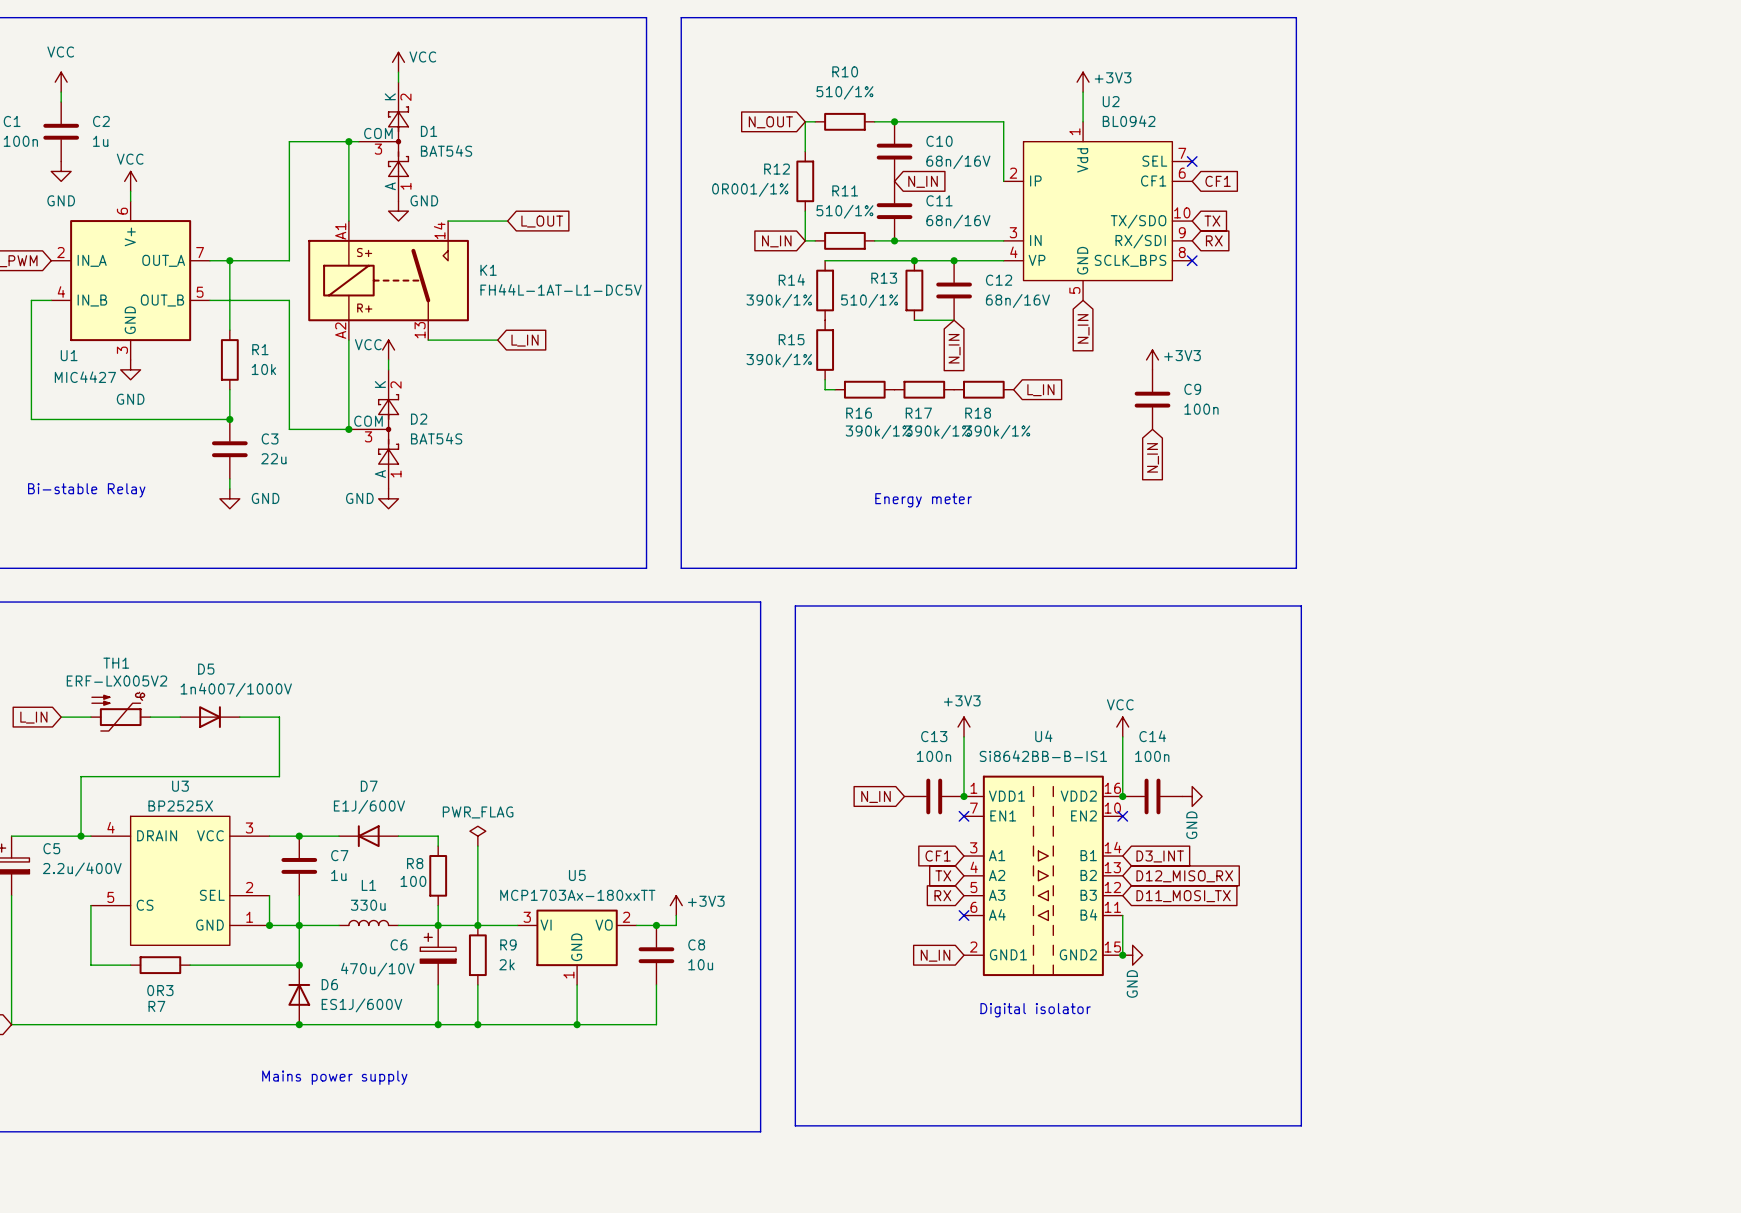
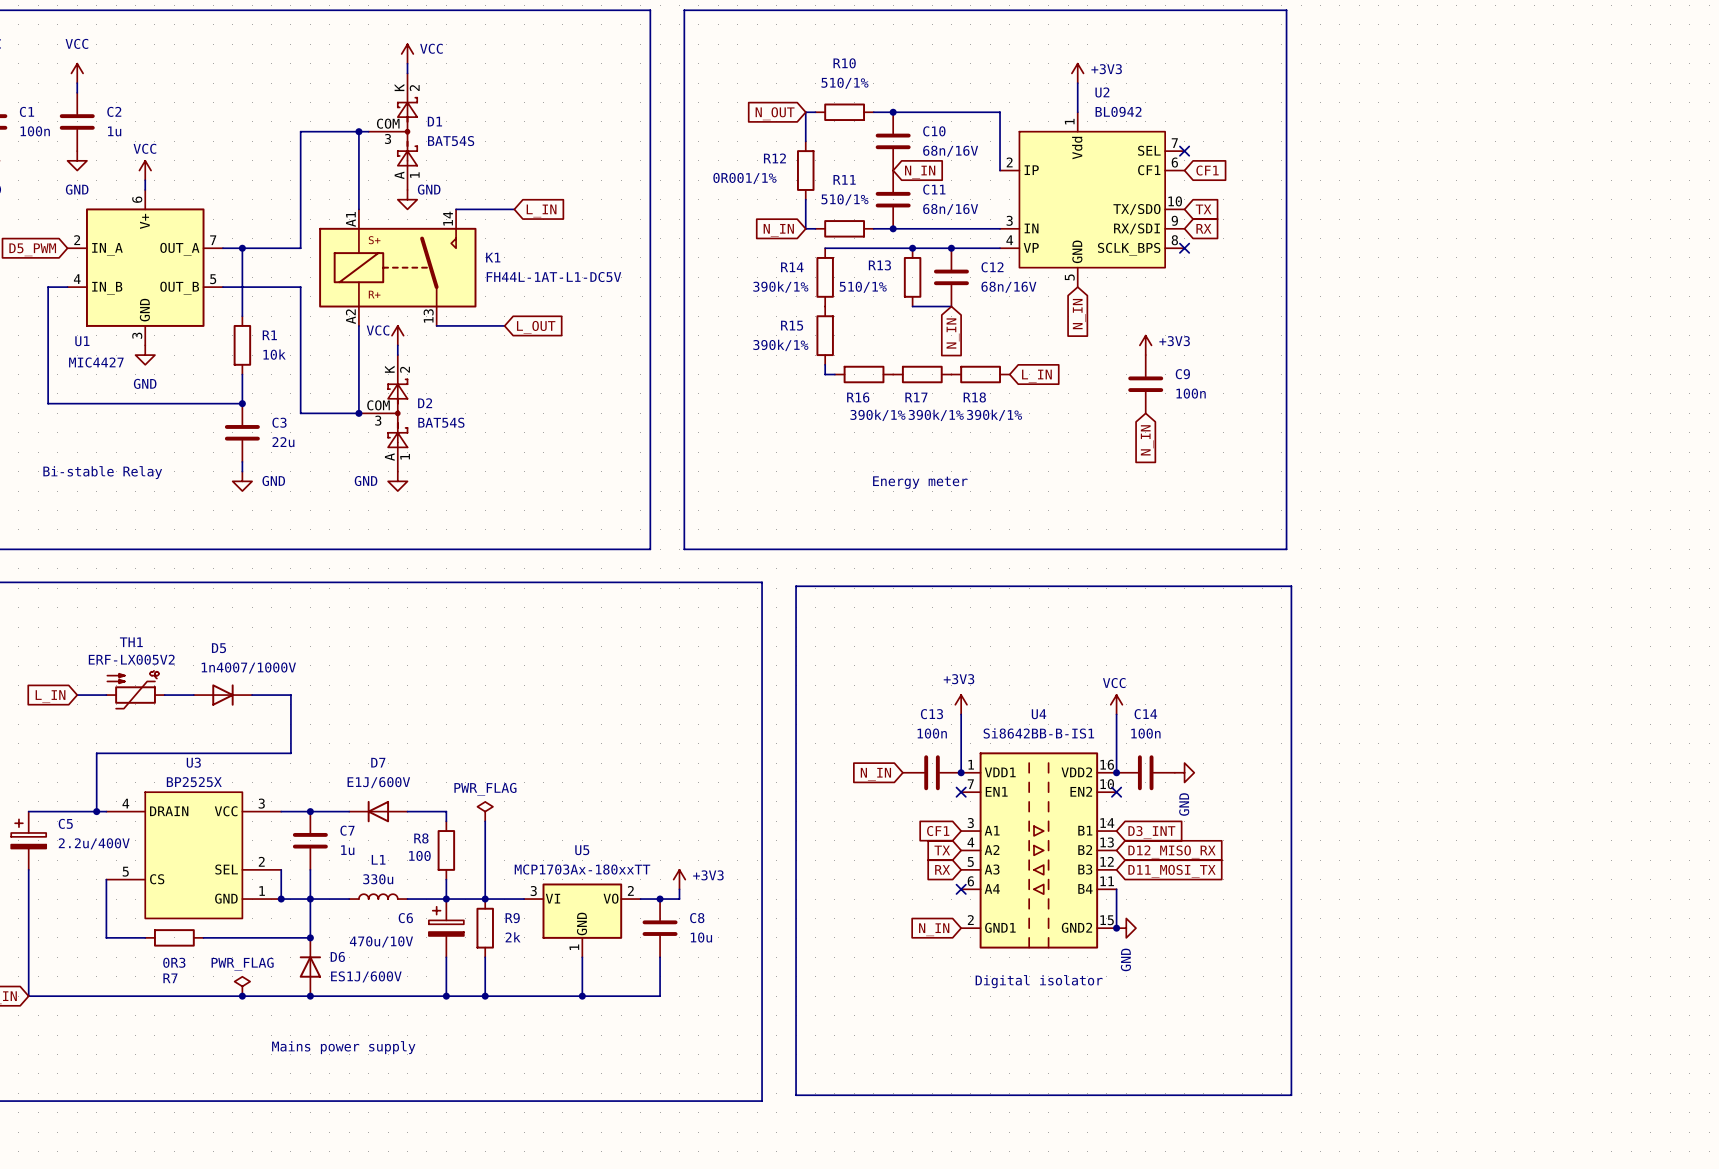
global label: L_OUT (542, 221) -> L_IN (541, 210)
global label: L_IN (525, 340) -> L_OUT (536, 327)
power symbol: none -> PWR_FLAG (242, 986)
junction: none -> (242, 996)

